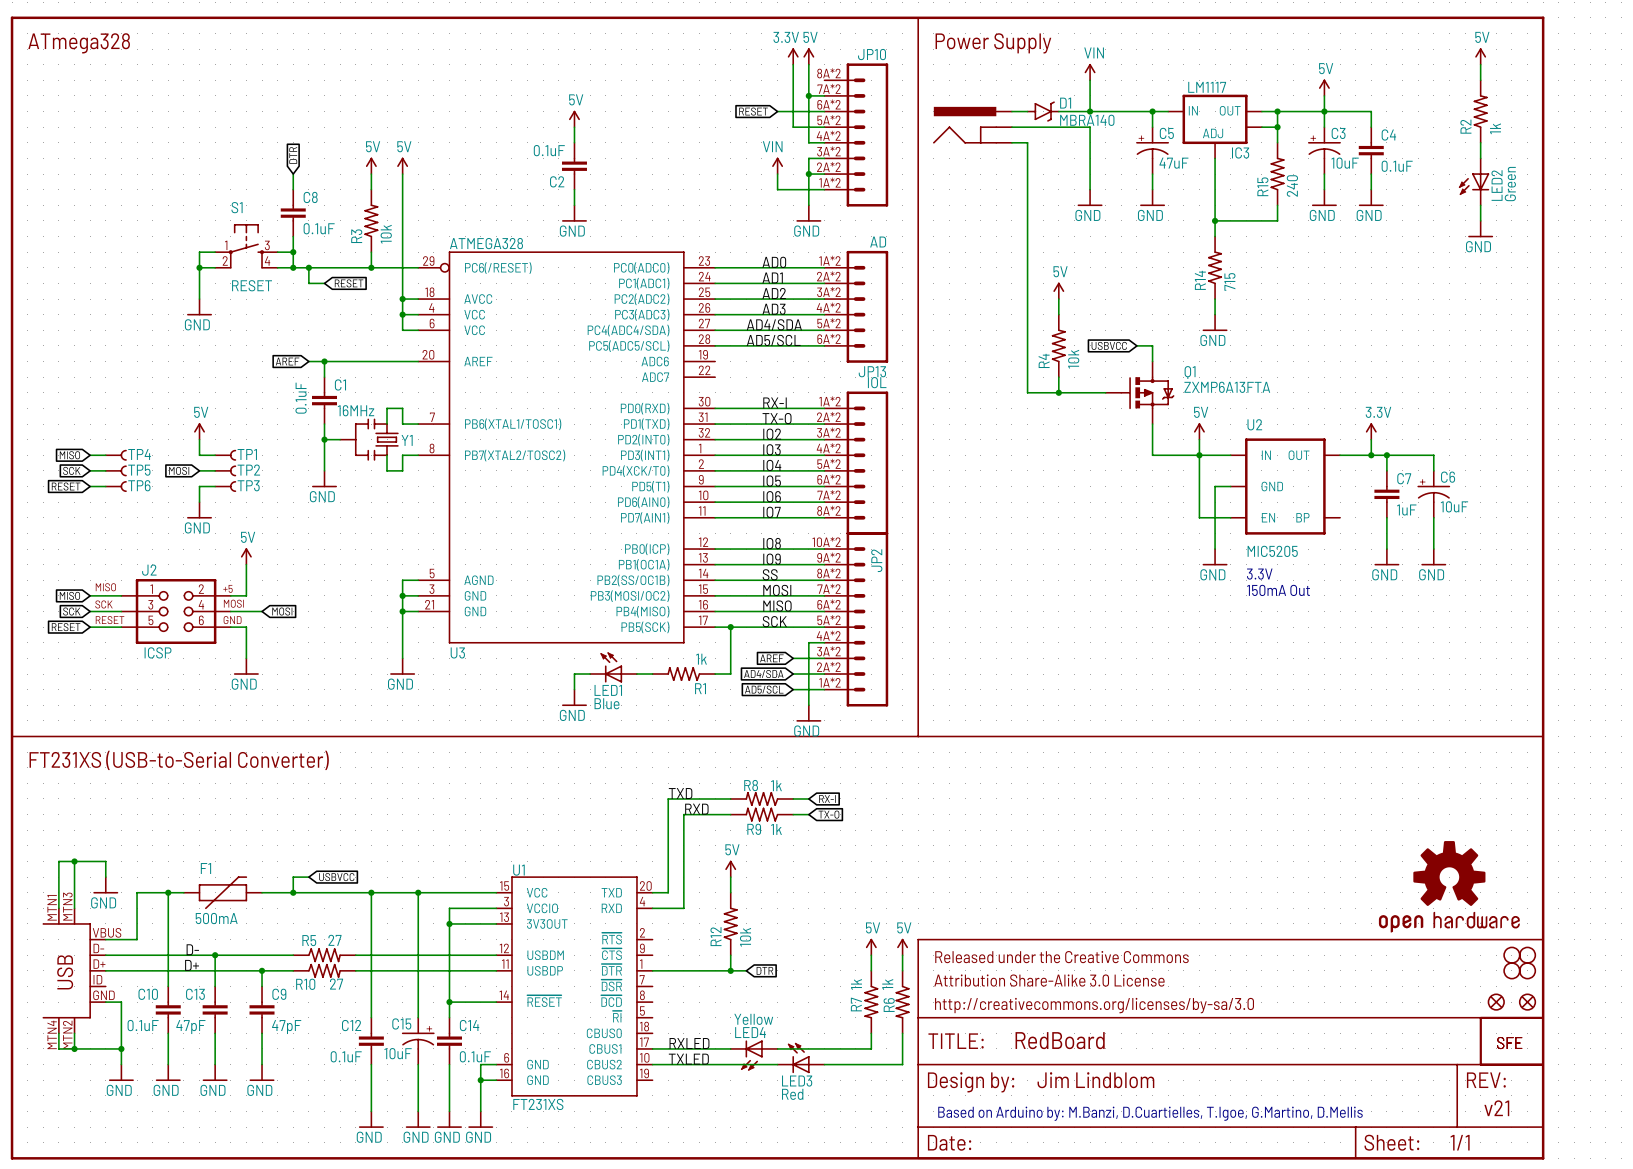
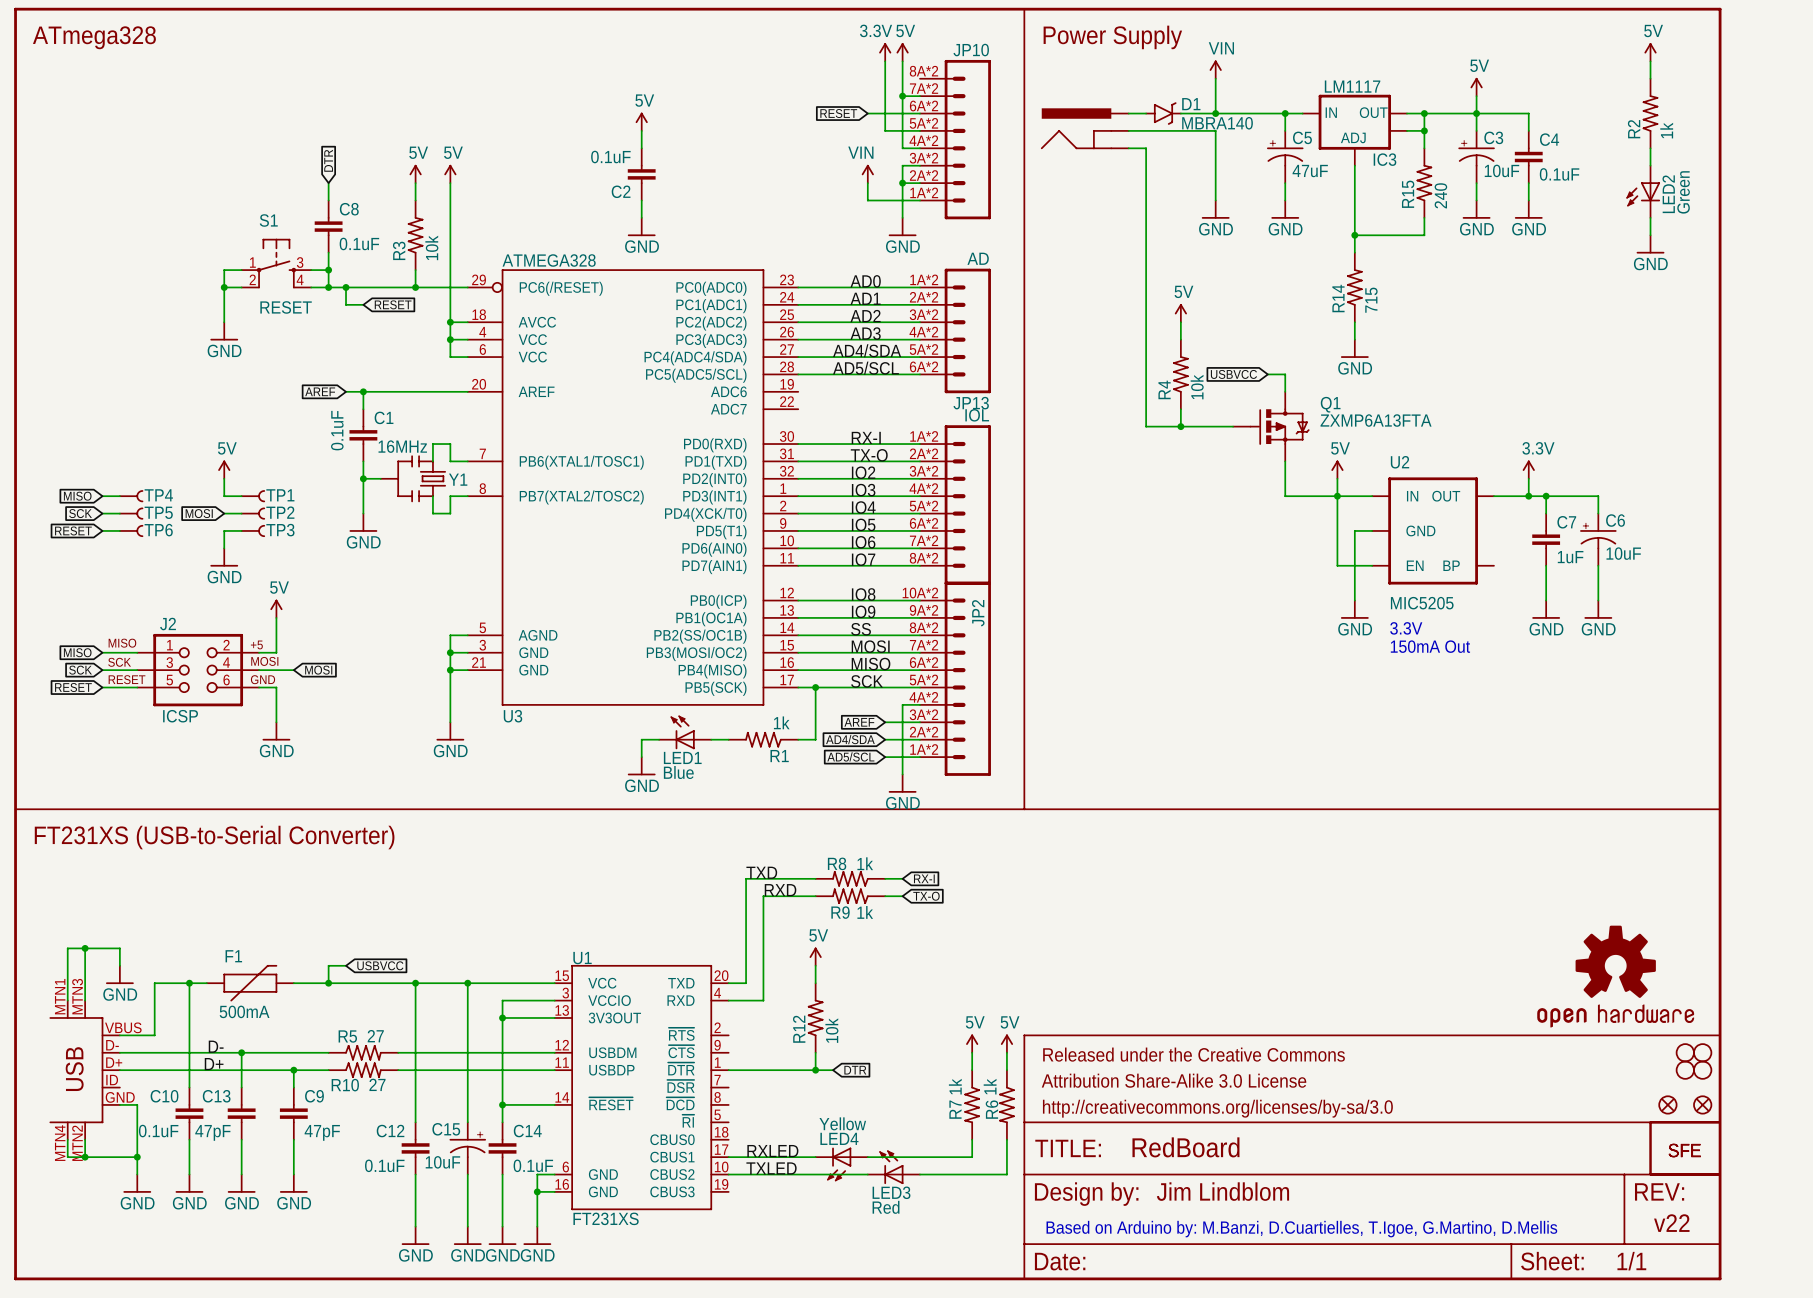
text: v21 (1496, 1108) -> v22 (1671, 1223)

